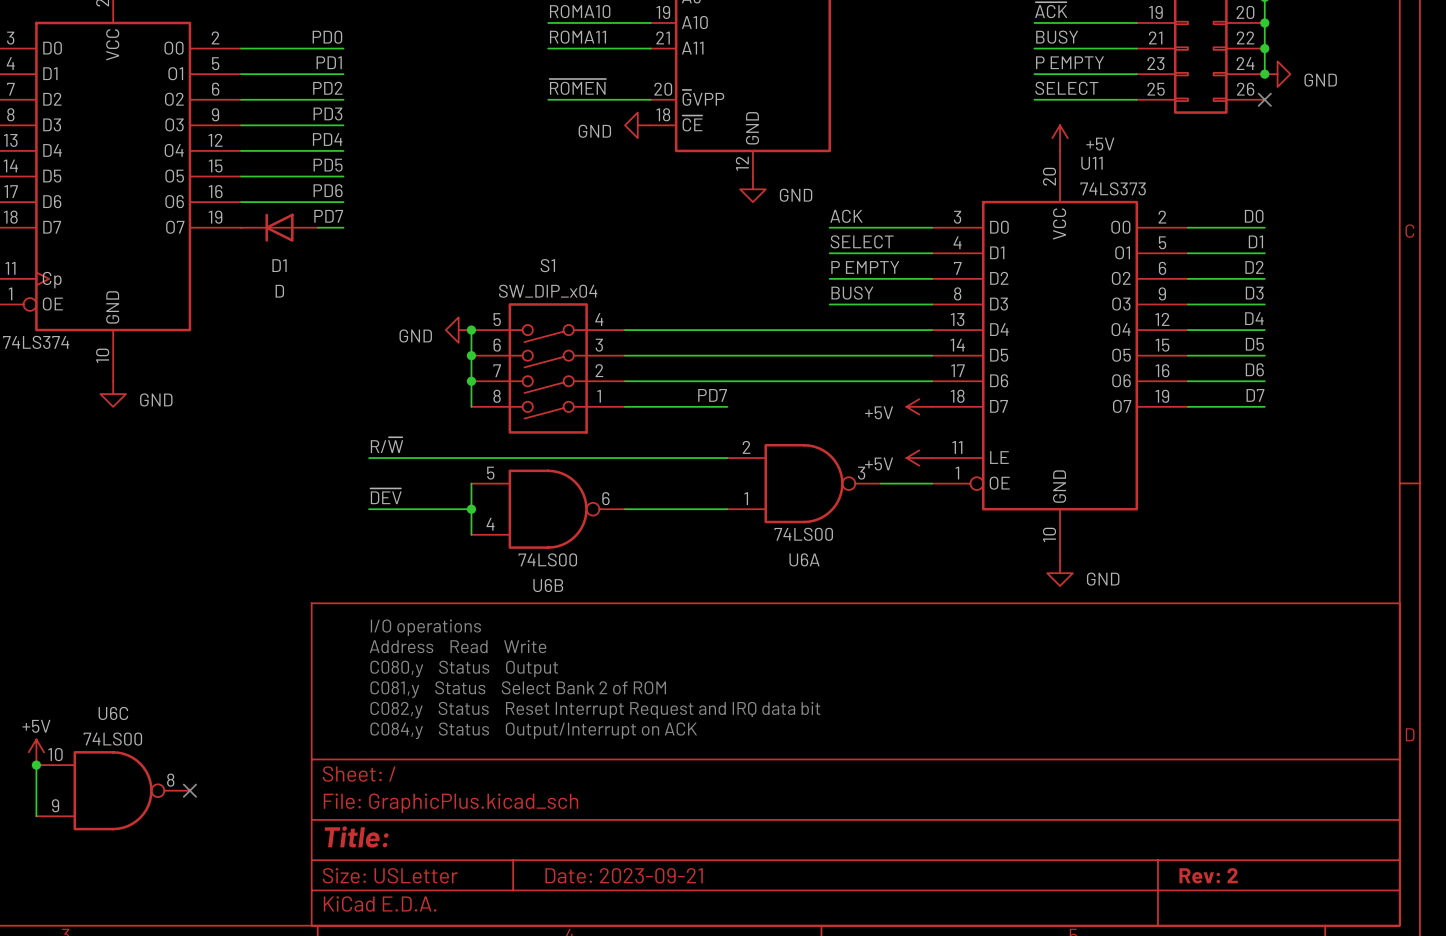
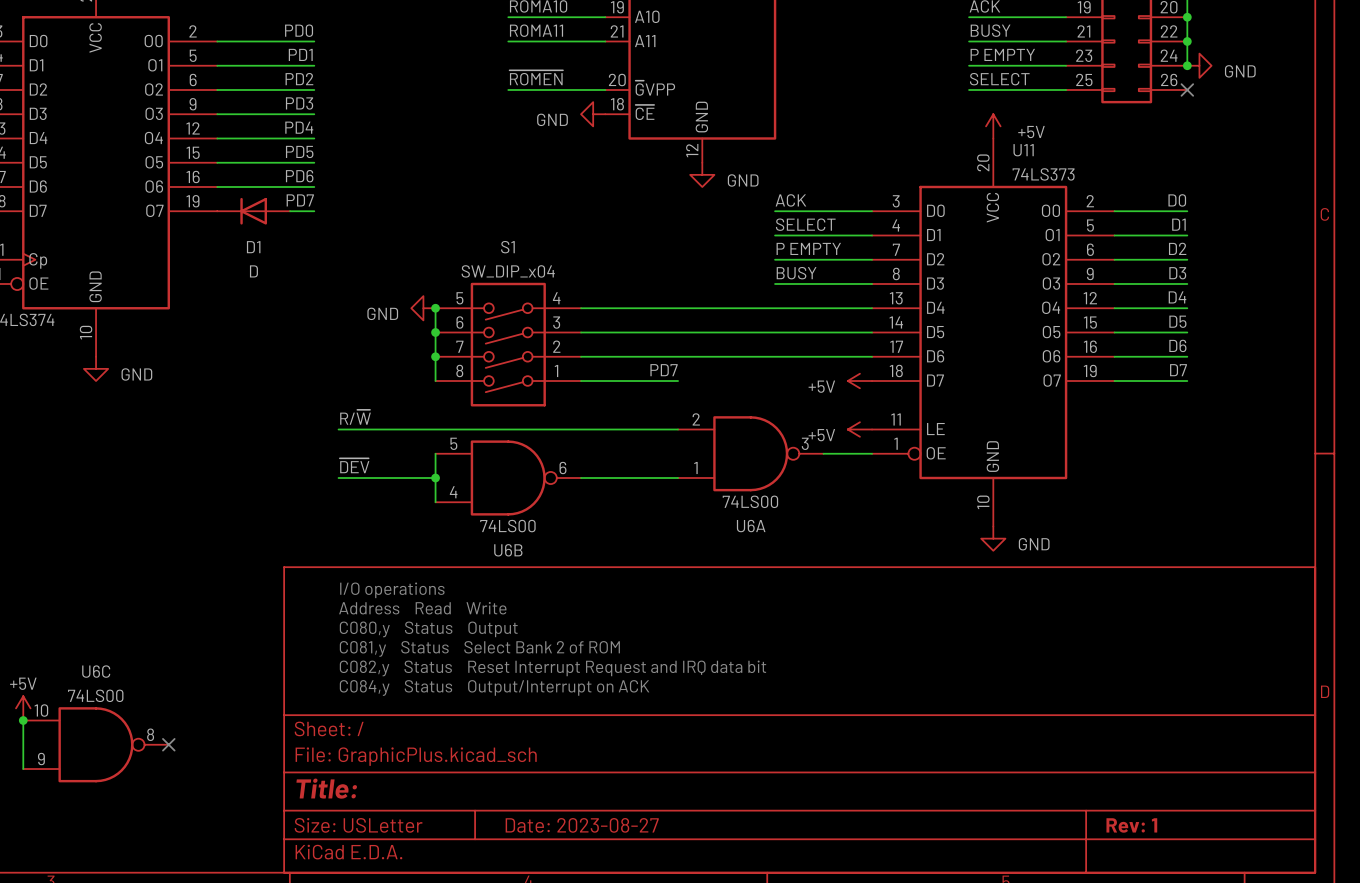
title block: Date: 2023-09-21 (624, 875) -> Date: 2023-08-27 (582, 825)
title block: Rev: 2 (1208, 875) -> Rev: 1 (1131, 825)

